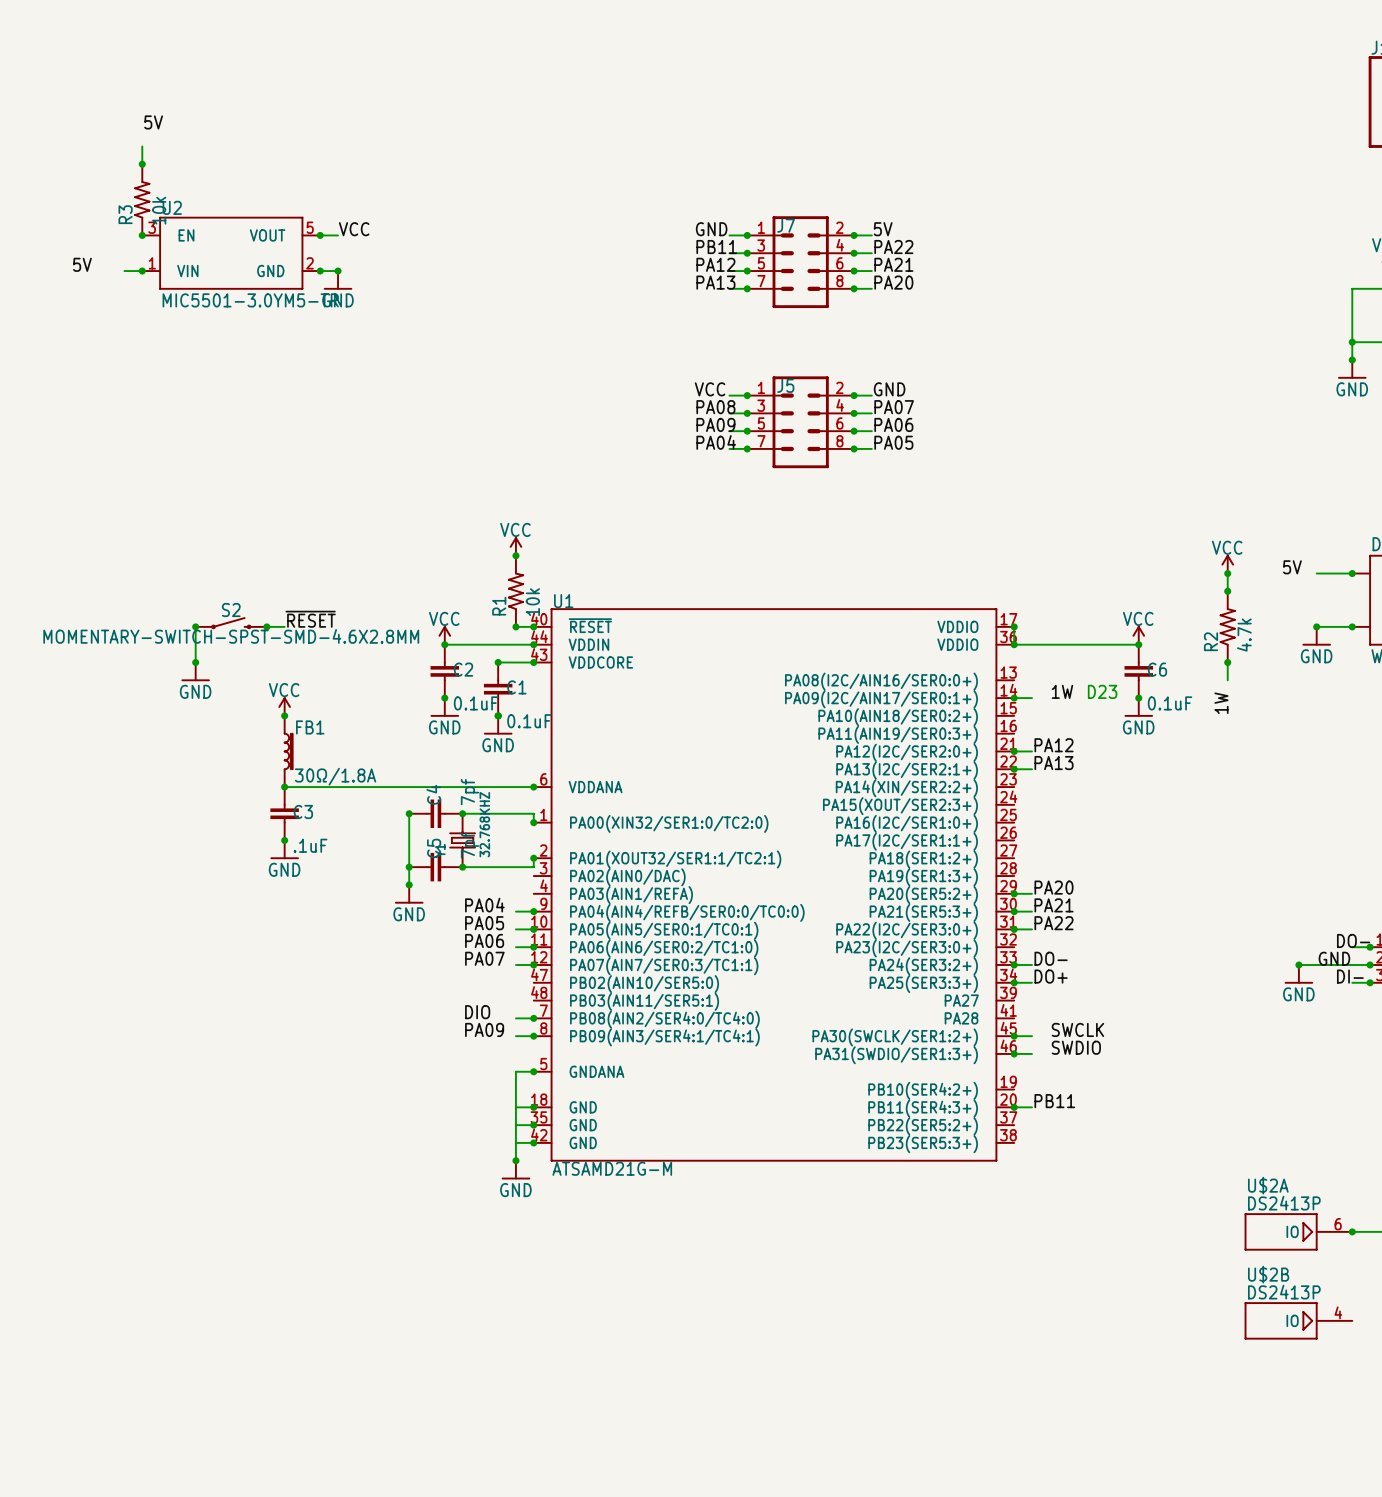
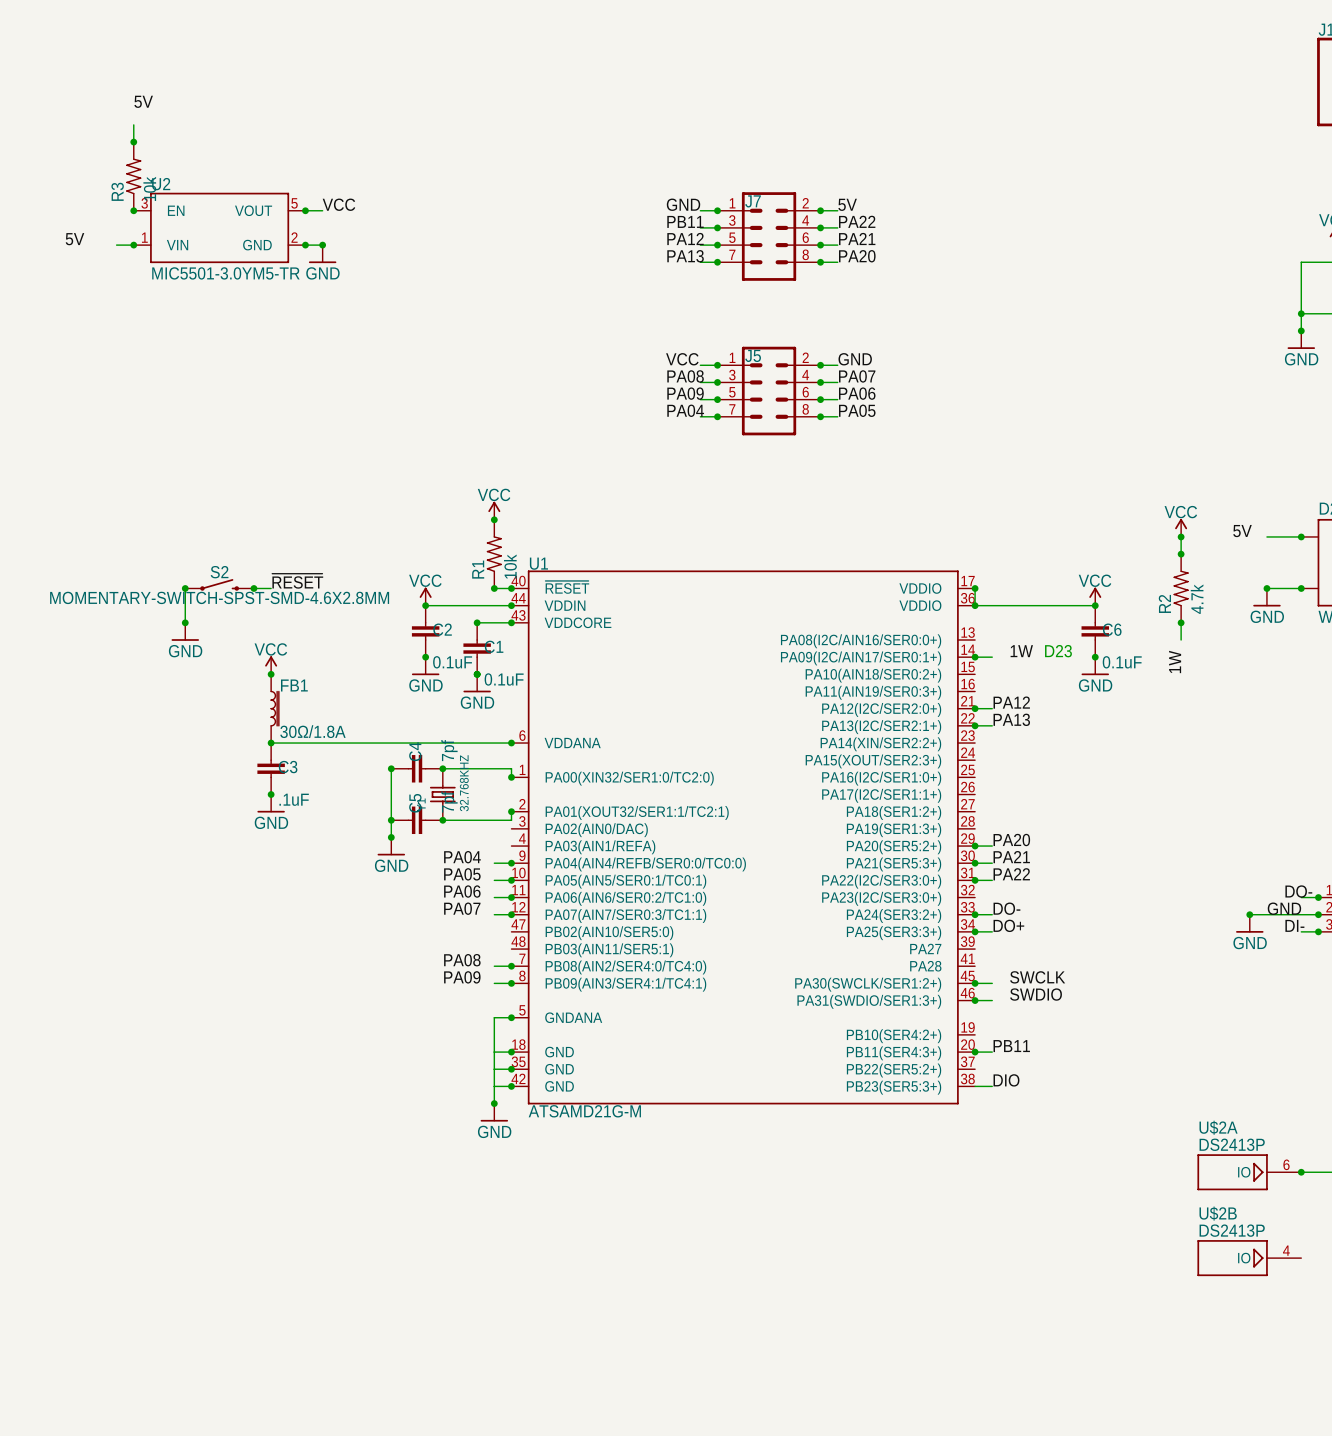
label: DIO (477, 1012) -> PA08 (462, 960)
label: none -> DIO (1006, 1080)
wire: none -> (975, 1086) (992, 1086)

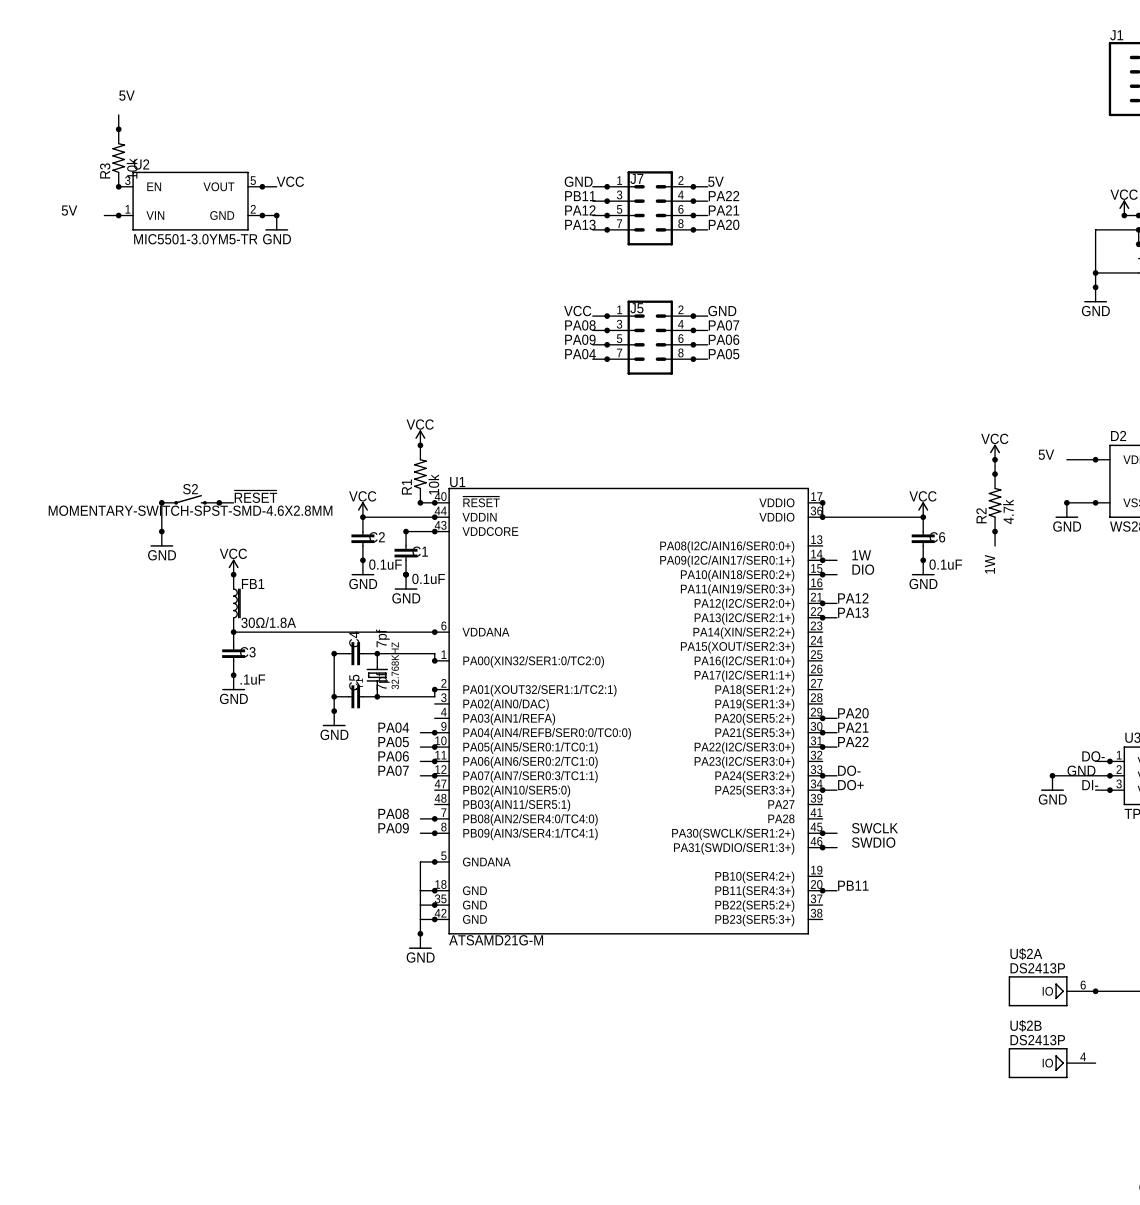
text: D23 (1058, 651) -> none
label: none -> DIO (863, 569)
wire: none -> (822, 574) (837, 574)
junction: none -> (822, 574)
label: DIO (1006, 1080) -> none
wire: (975, 1086) (992, 1086) -> none

